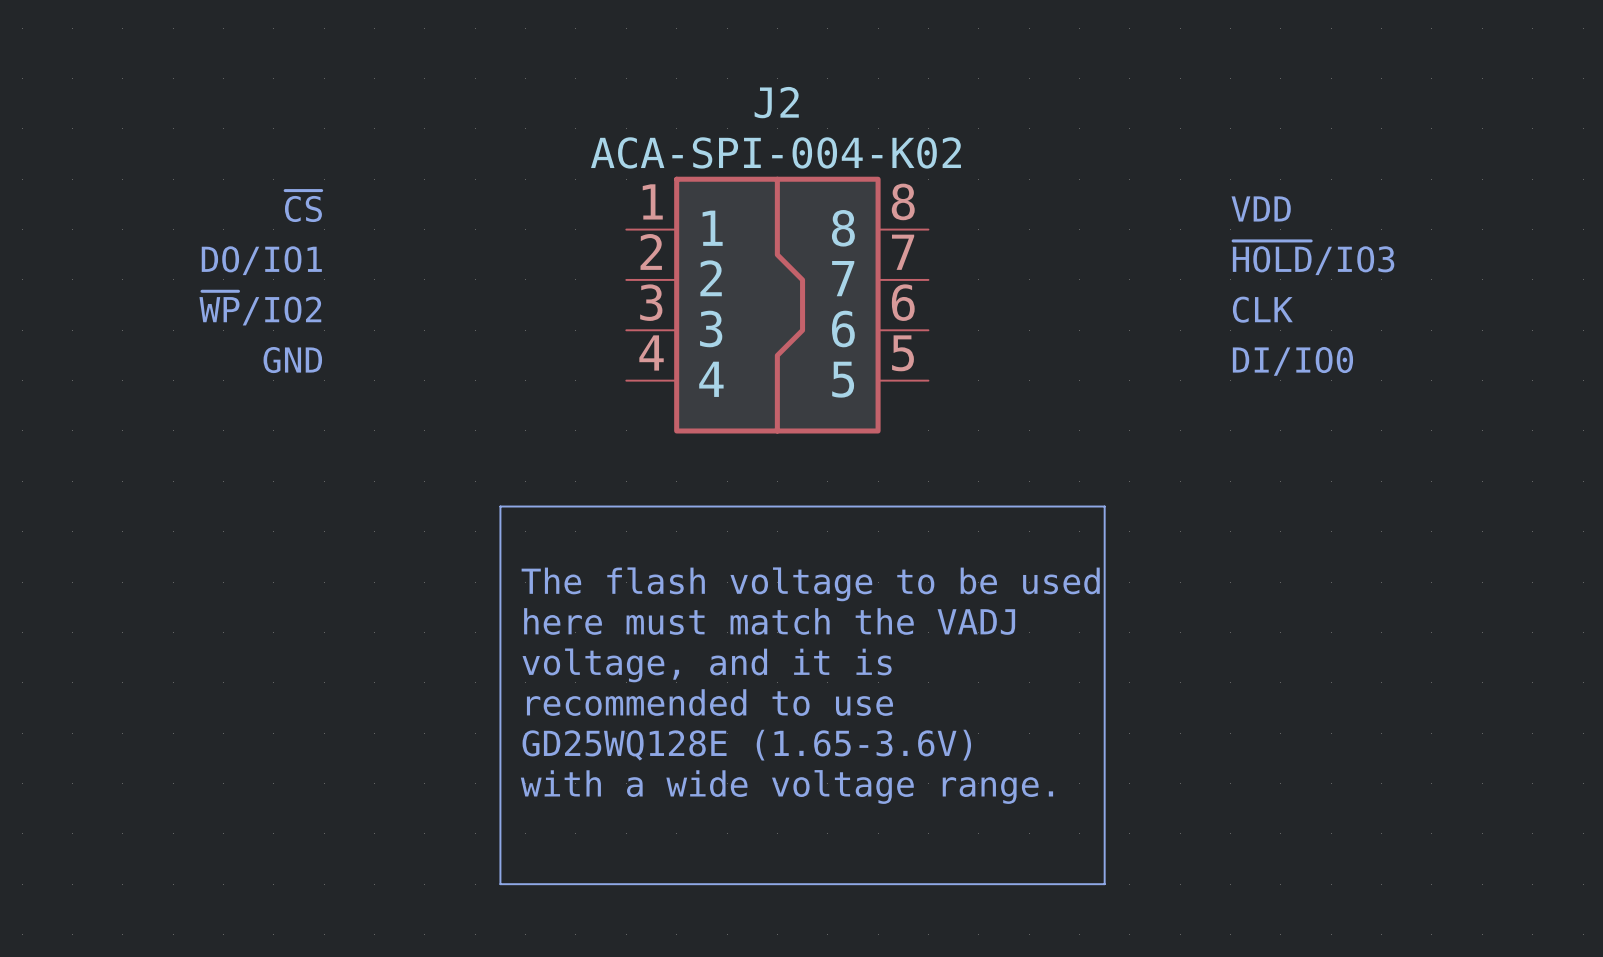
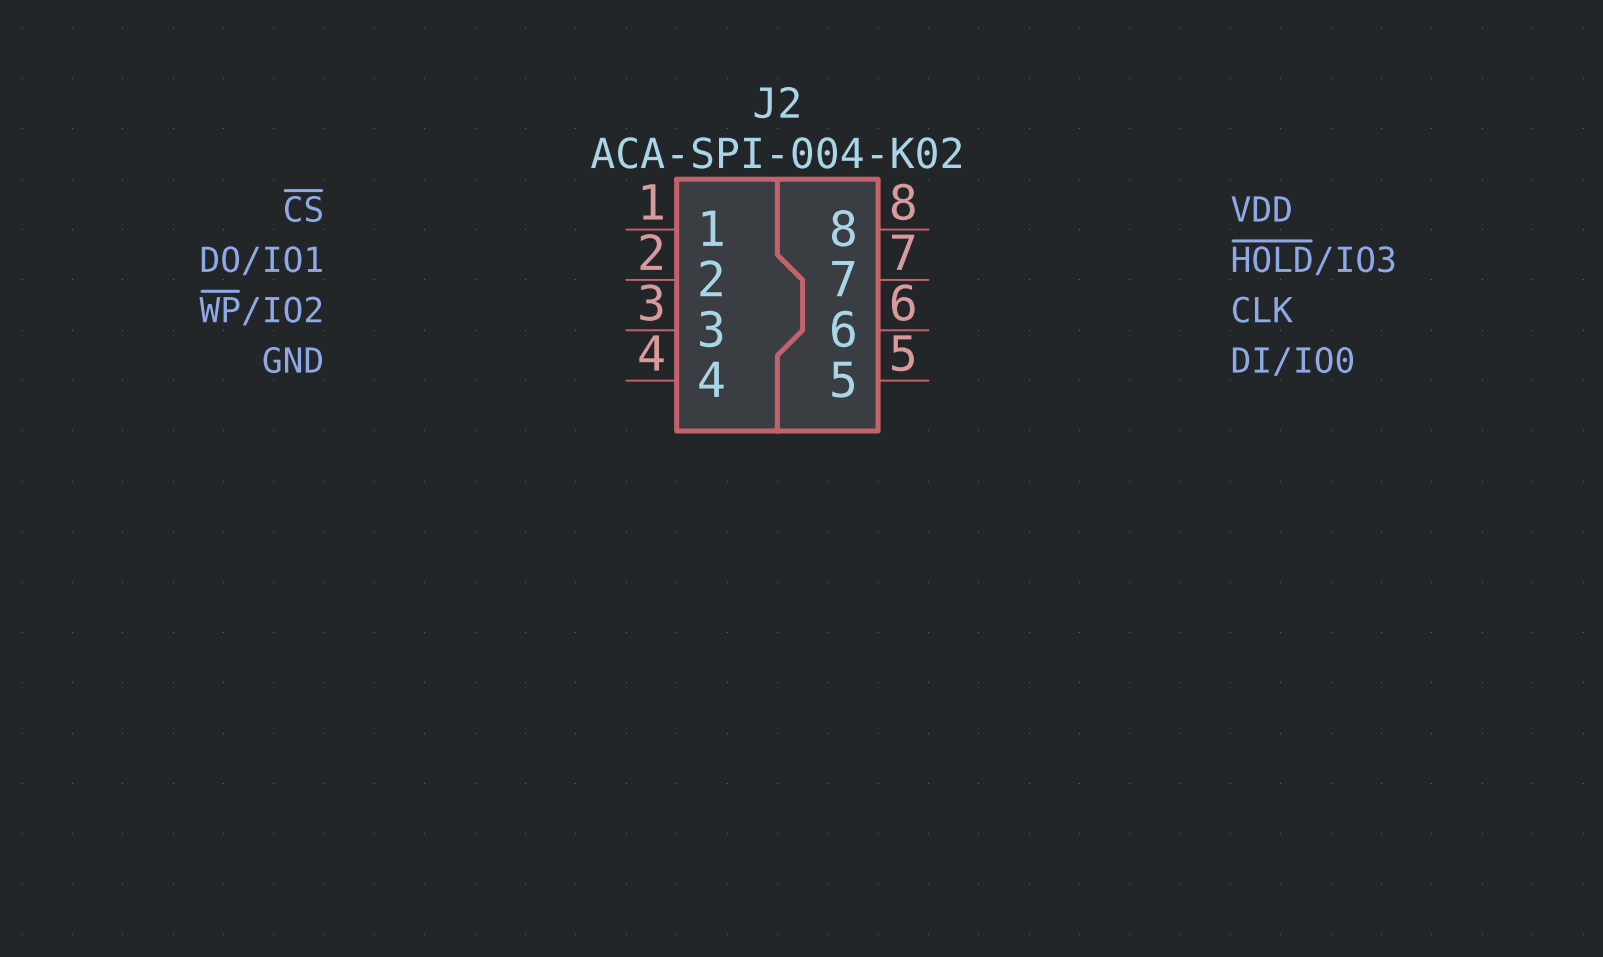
line: (500, 506) (1104, 506) (1104, 884) (500, 884) (500, 506) -> none
text: The flash voltage to be used (810, 584) -> none
text: here must match the VADJ (769, 621) -> none
text: voltage, and it is (707, 665) -> none
text: recommended to use (709, 702) -> none
text: GD25WQ128E (1.65-3.6V) (746, 745) -> none
text: with a wide voltage range. (786, 787) -> none

